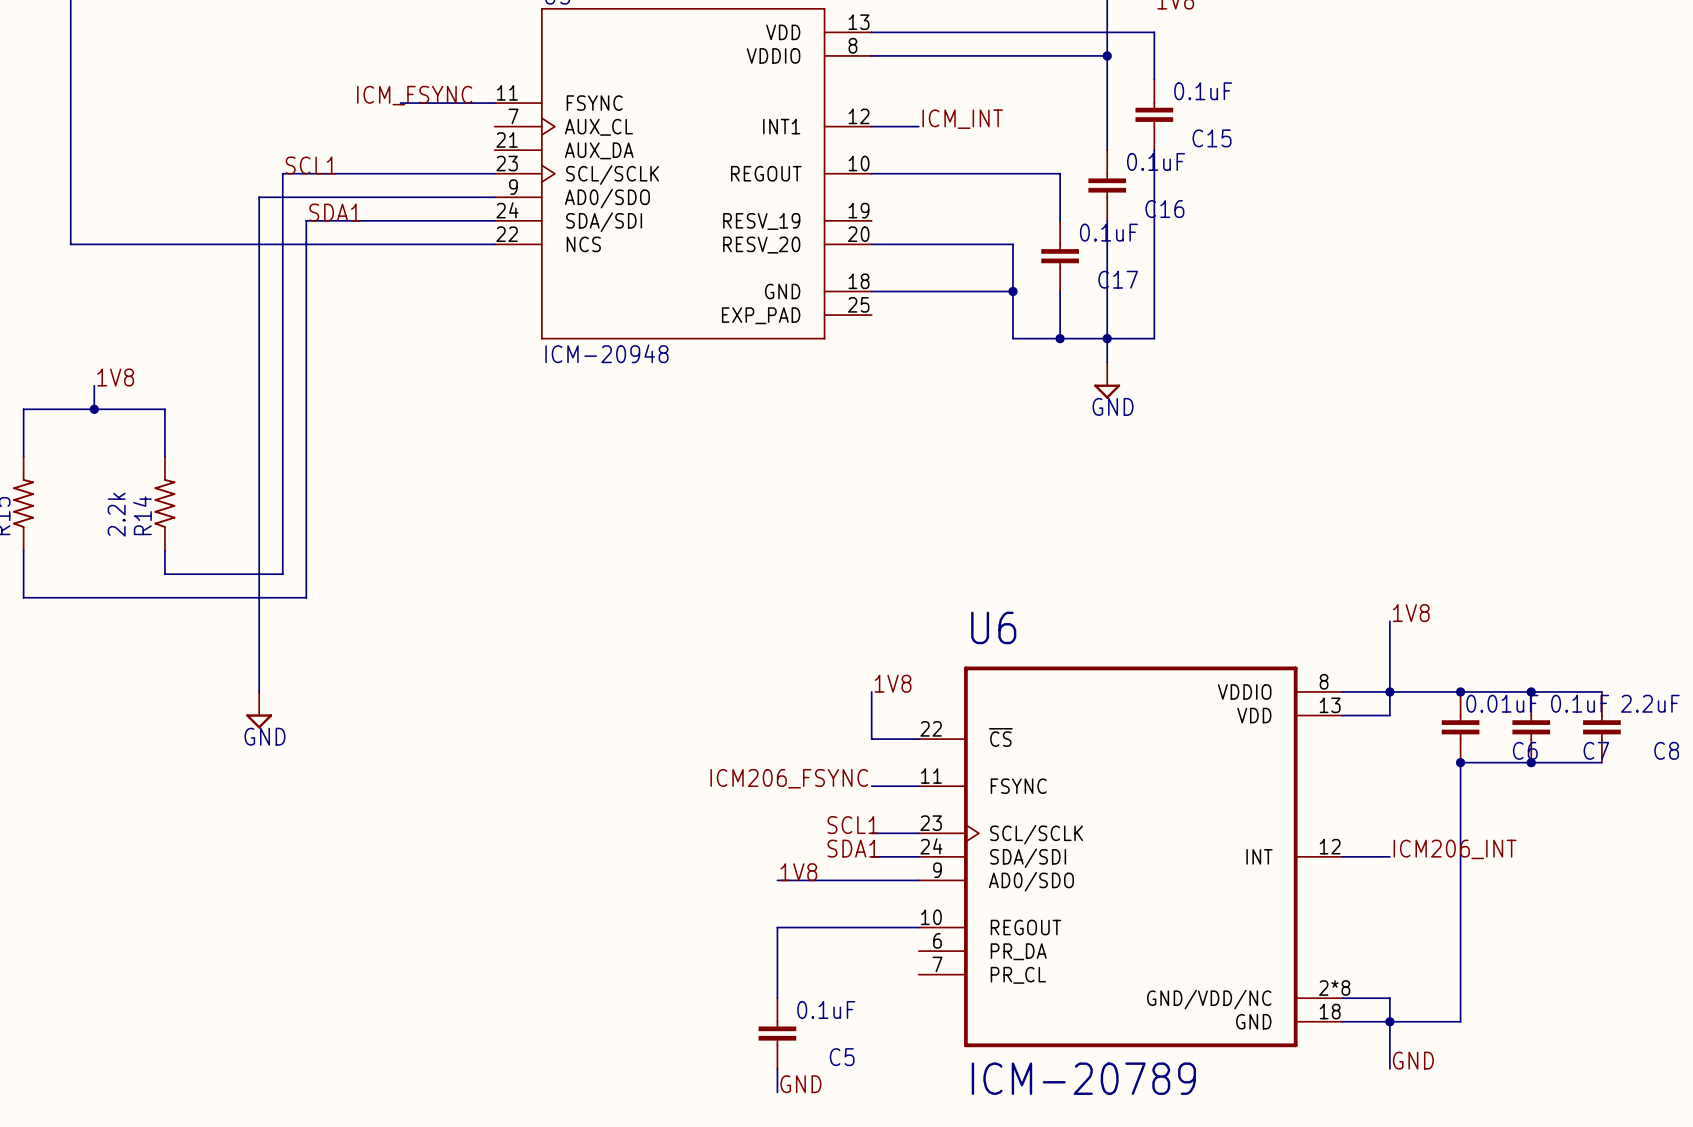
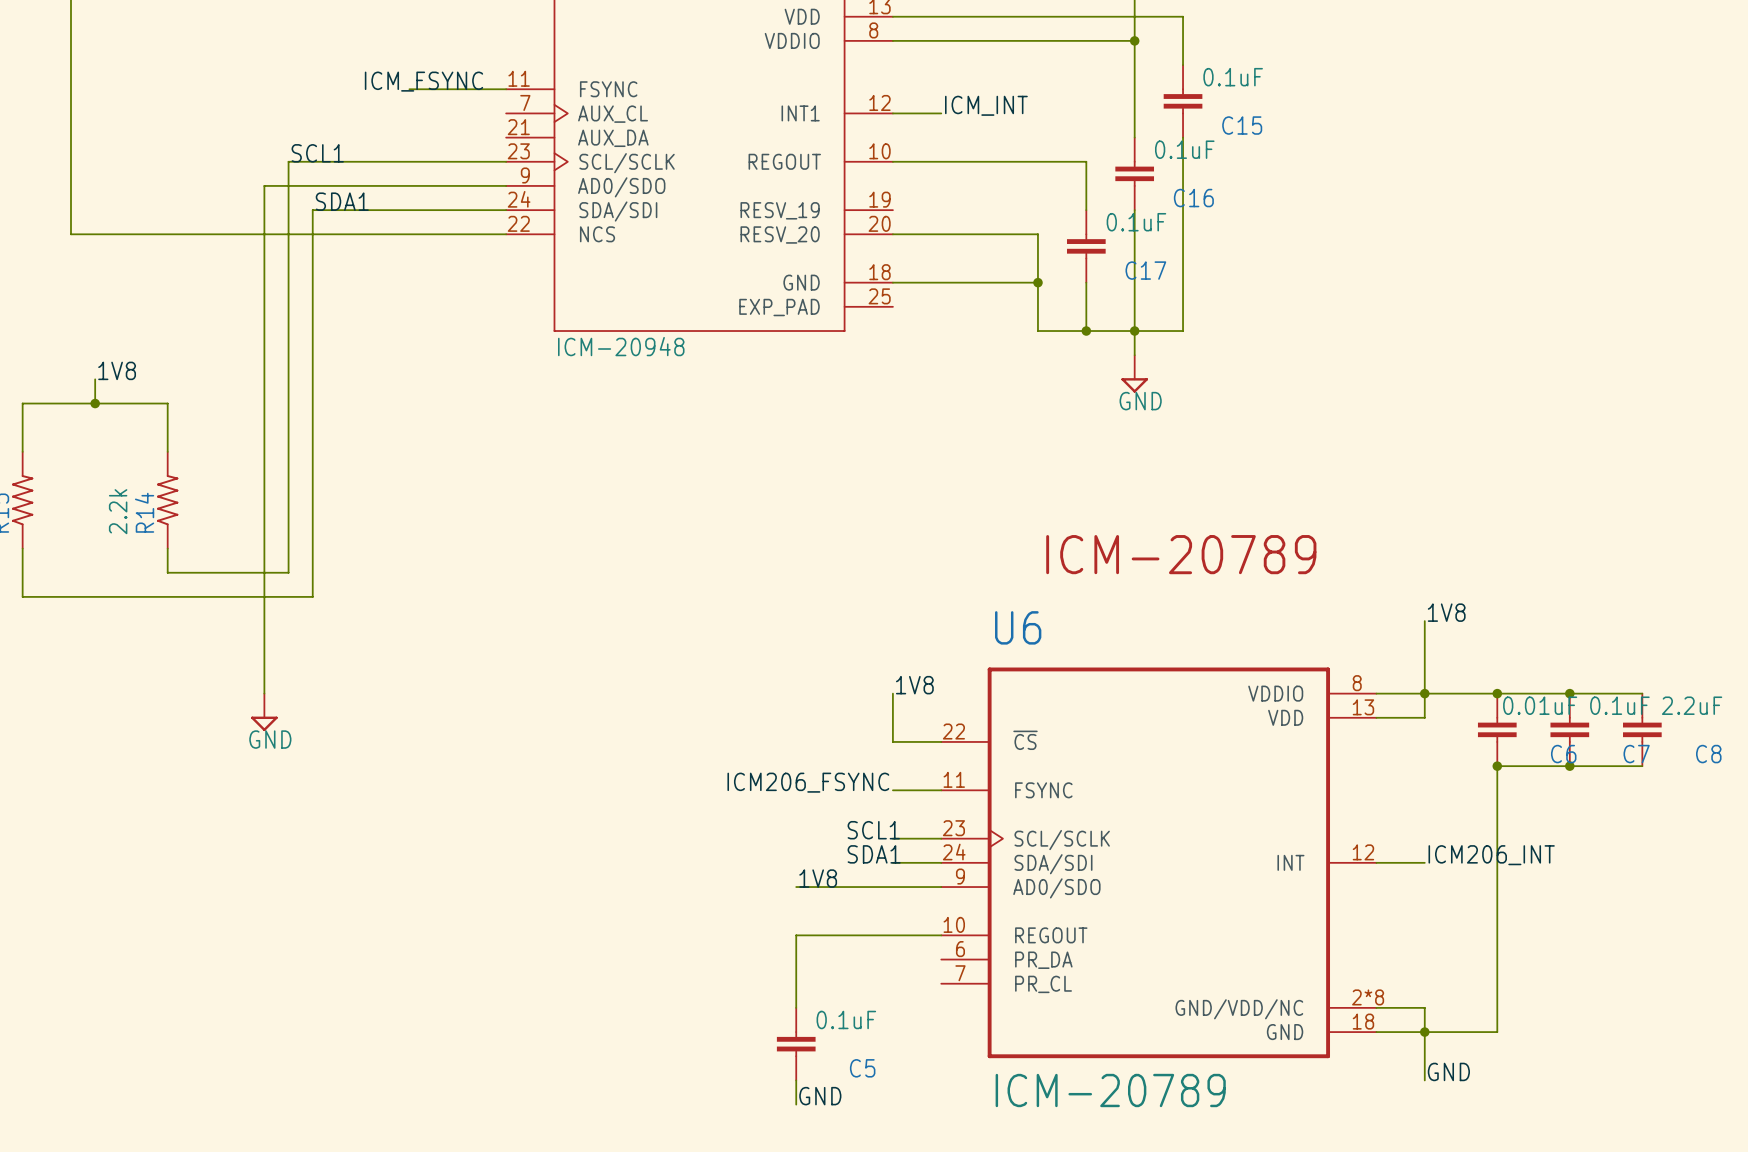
text: none -> ICM-20789 (1181, 554)

